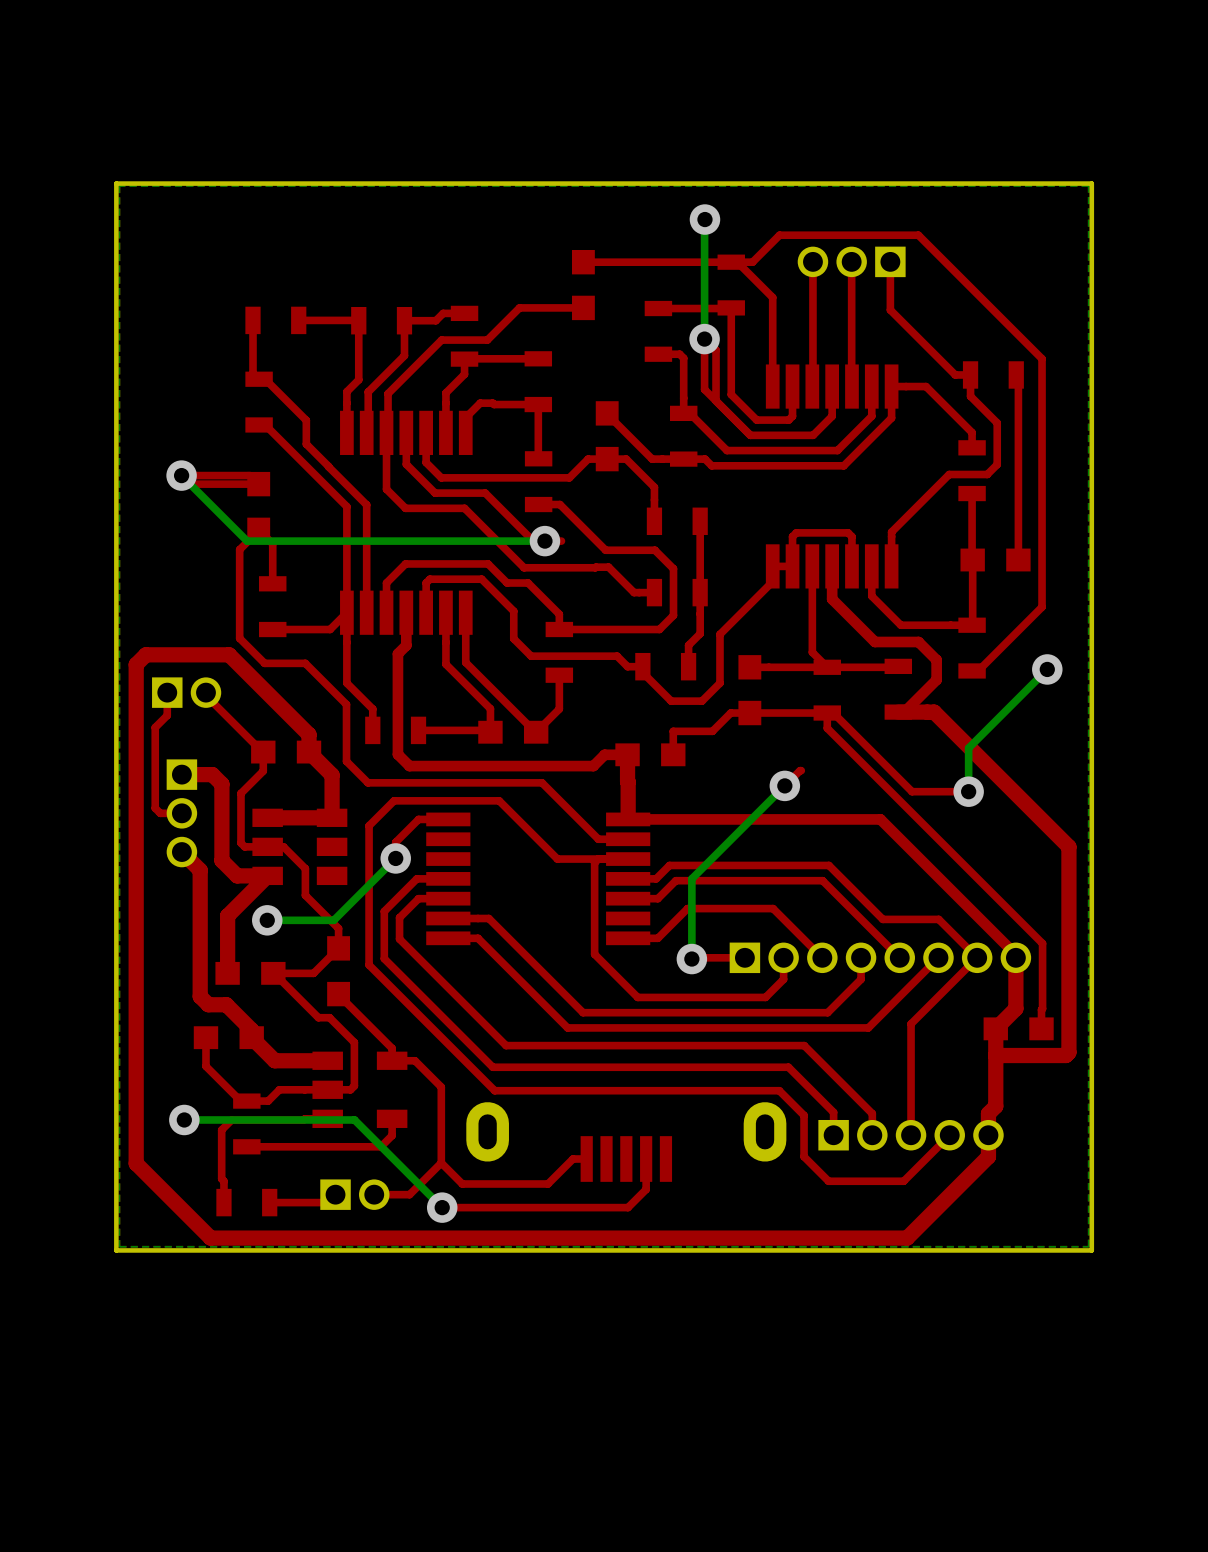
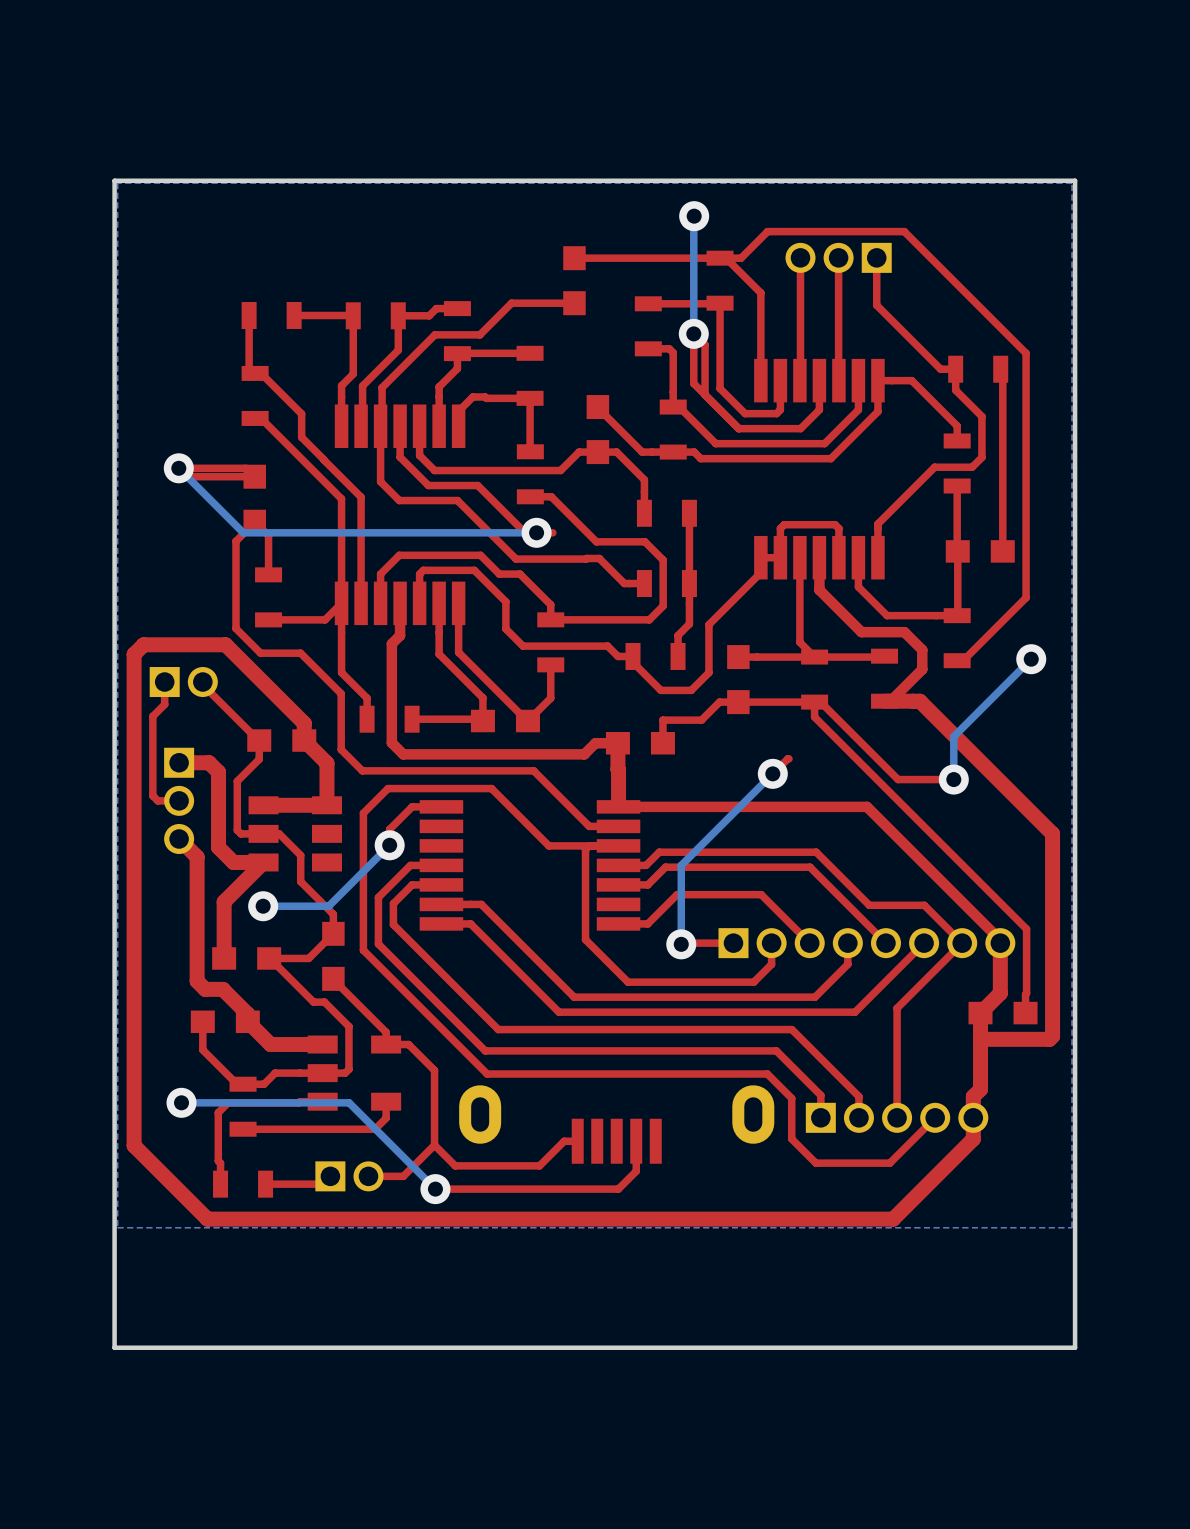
board edge: (1091, 1250) (116, 1250) -> (1075, 1231) (1075, 1347) (114, 1347) (114, 1231)

